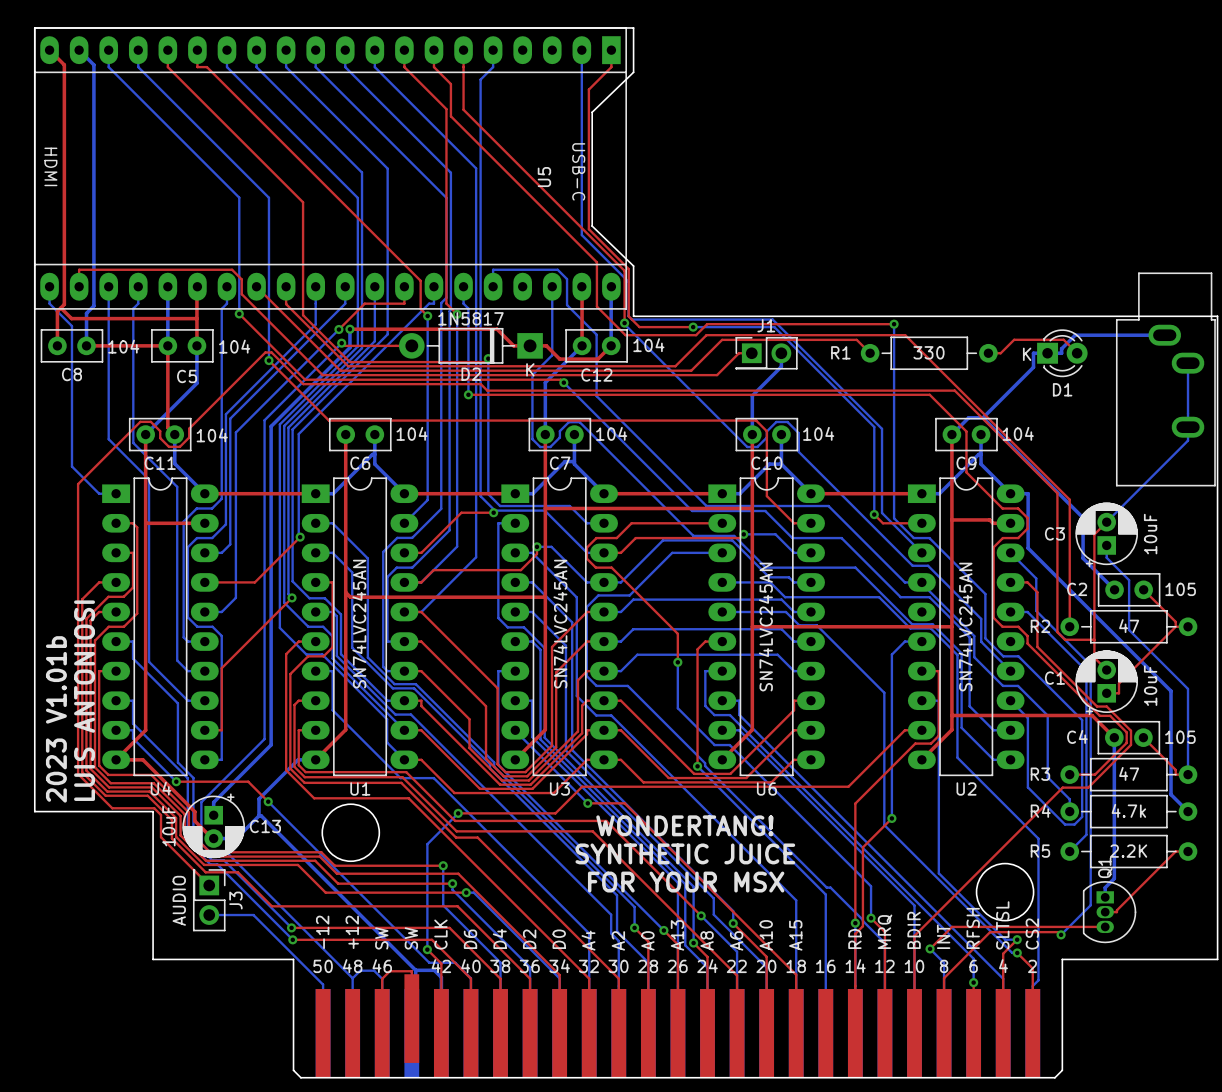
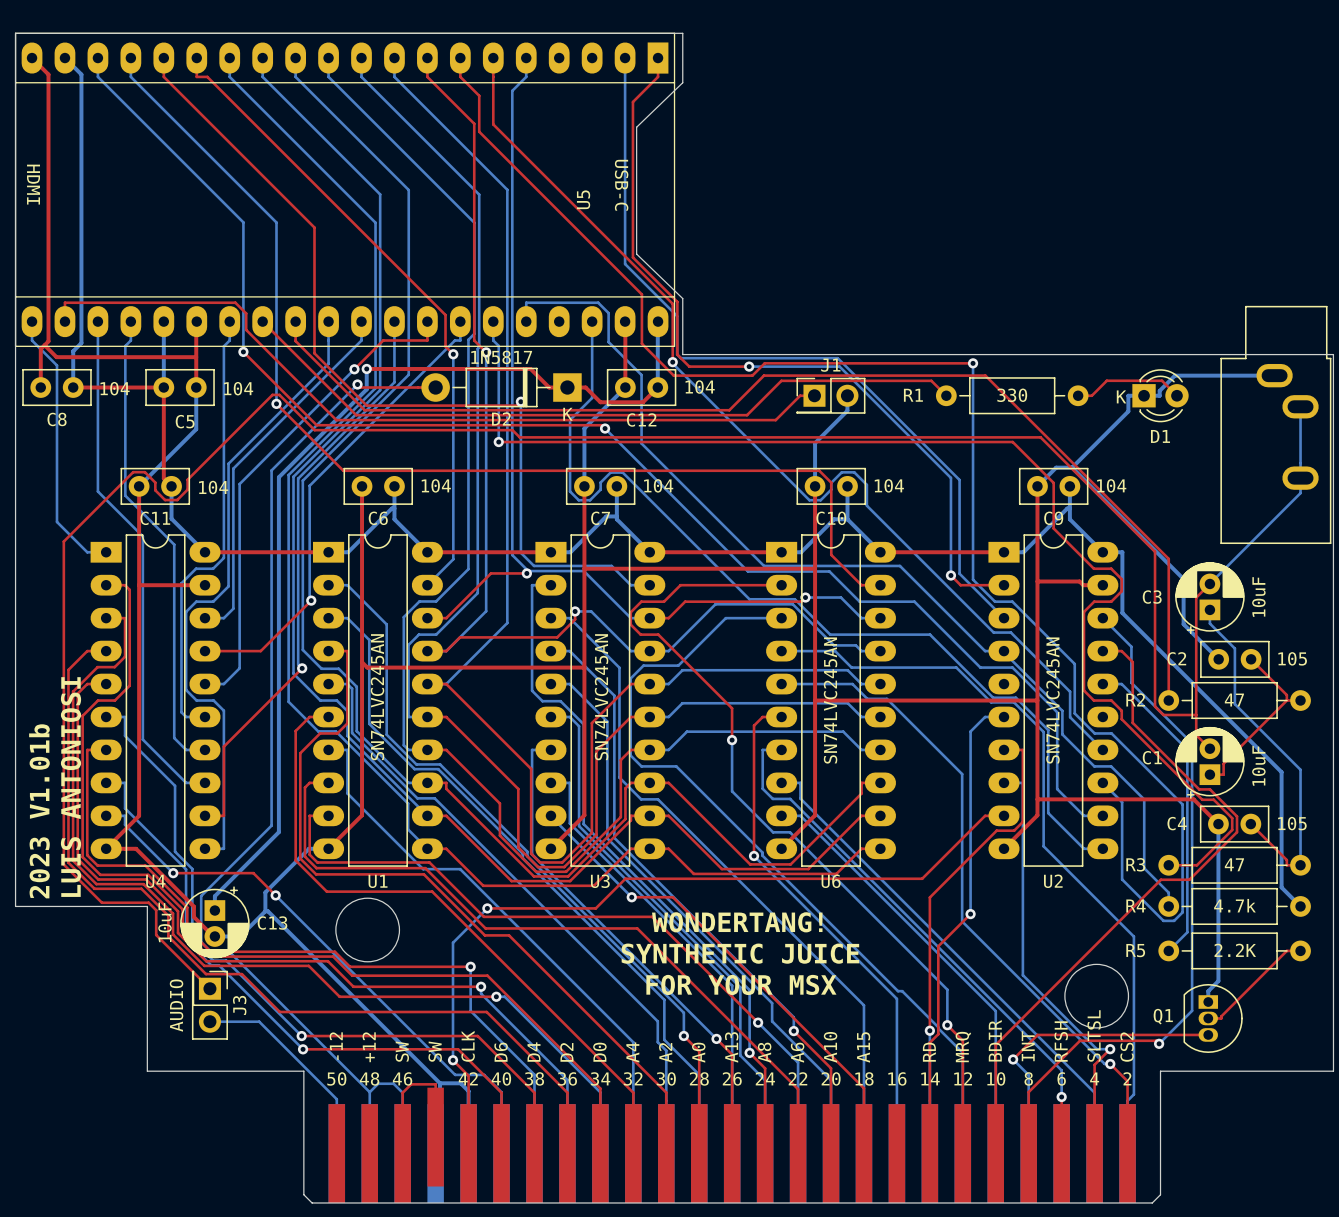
Q1 name rotation: 0° (1105, 867) -> 90° clockwise (1163, 1016)
Q1 name position: Q1 (1105, 867) -> Q1 (1163, 1016)

